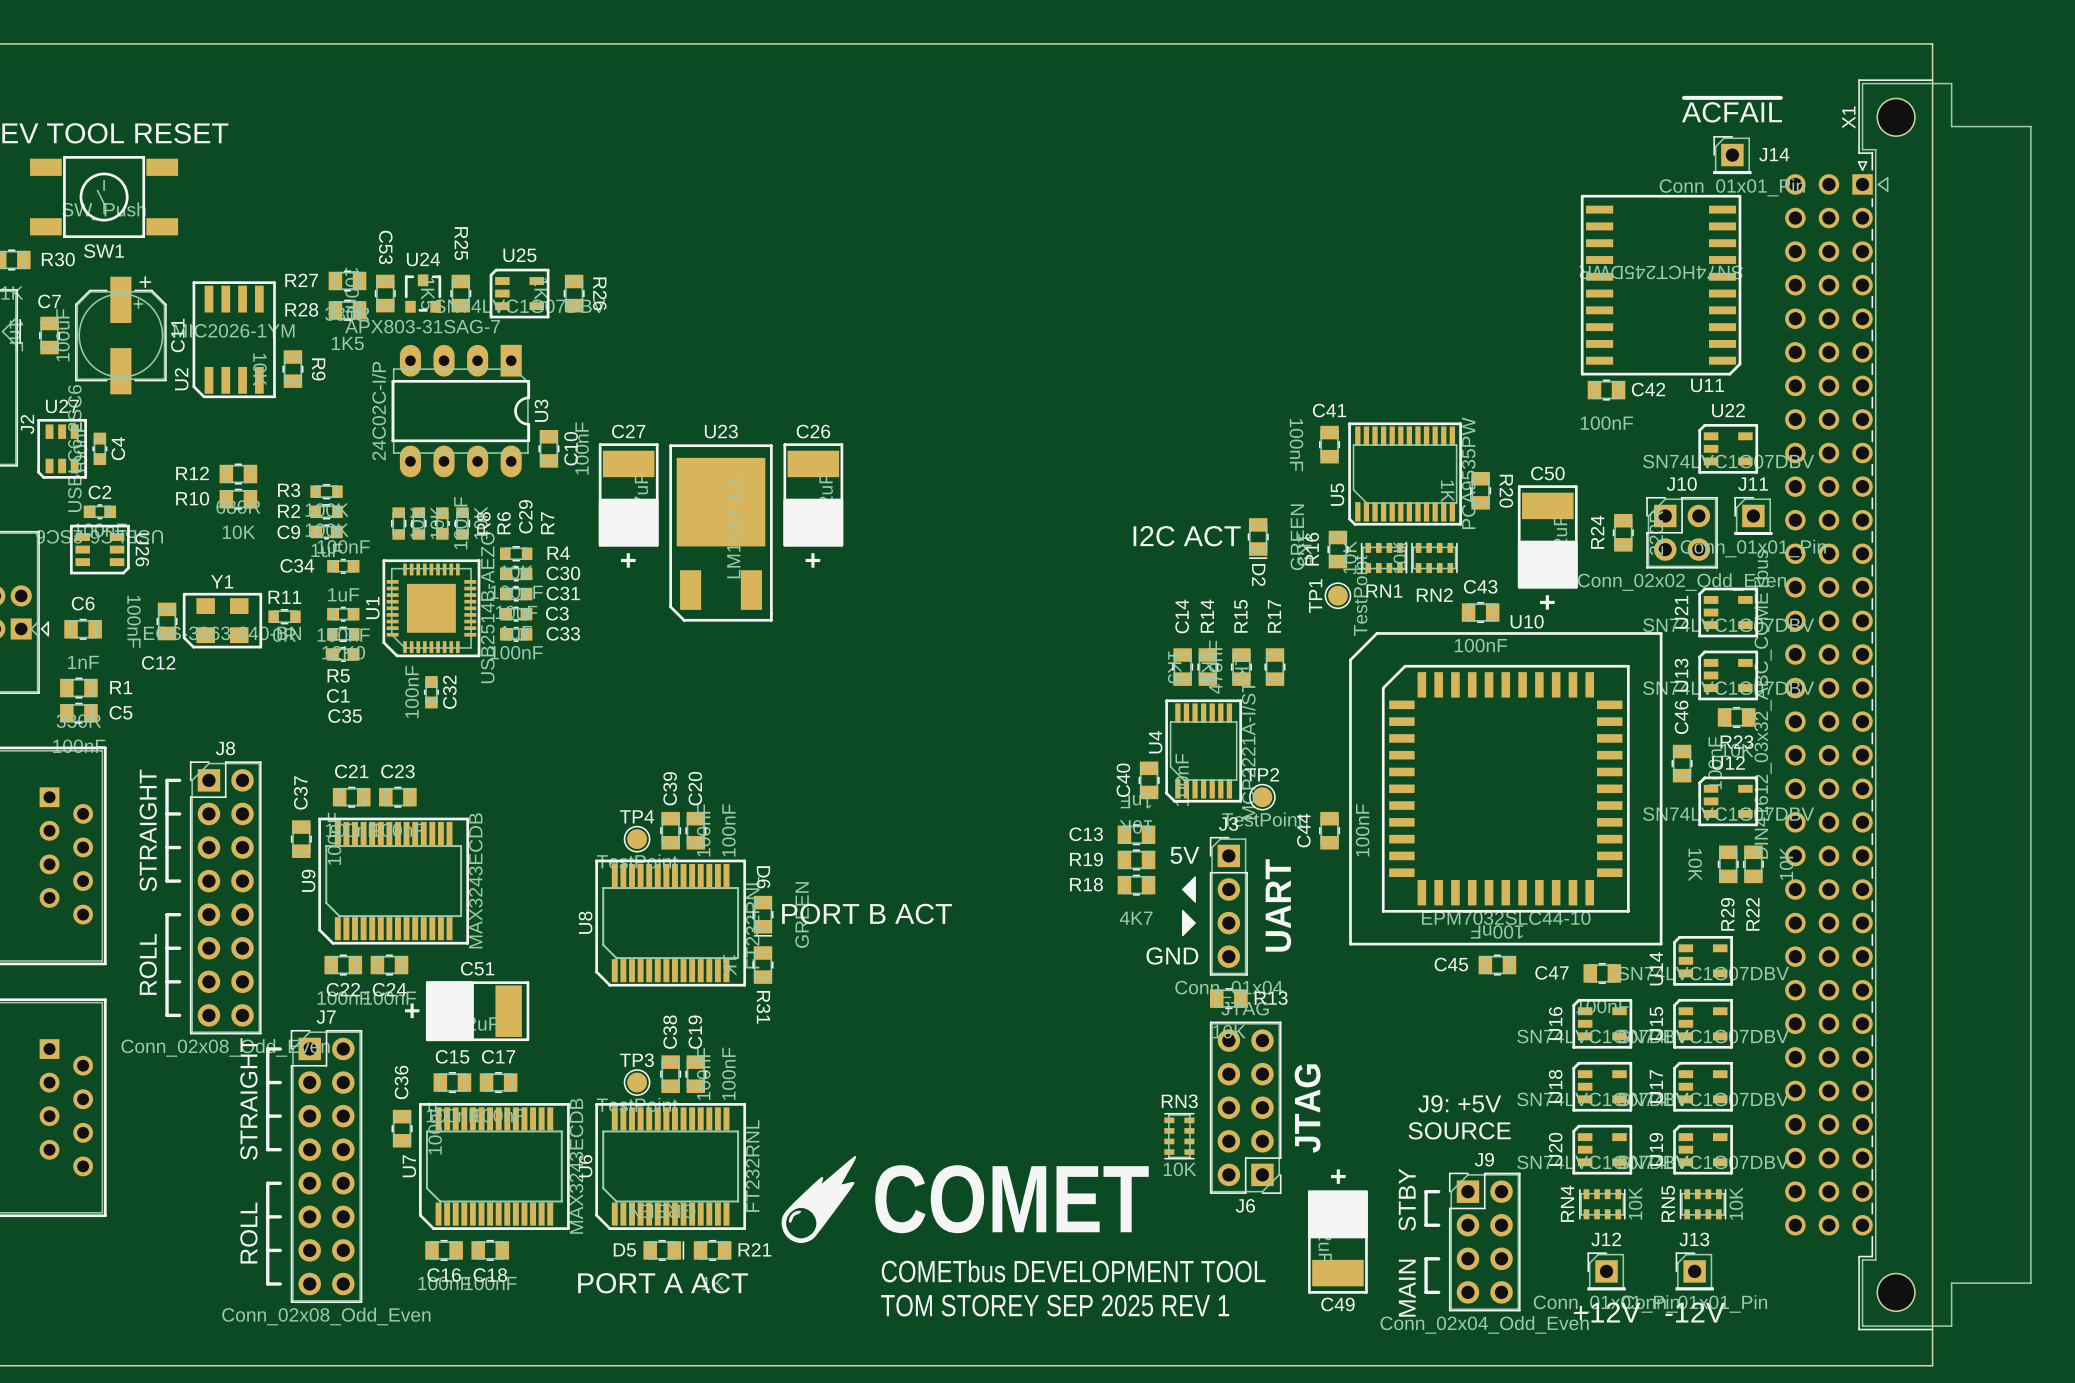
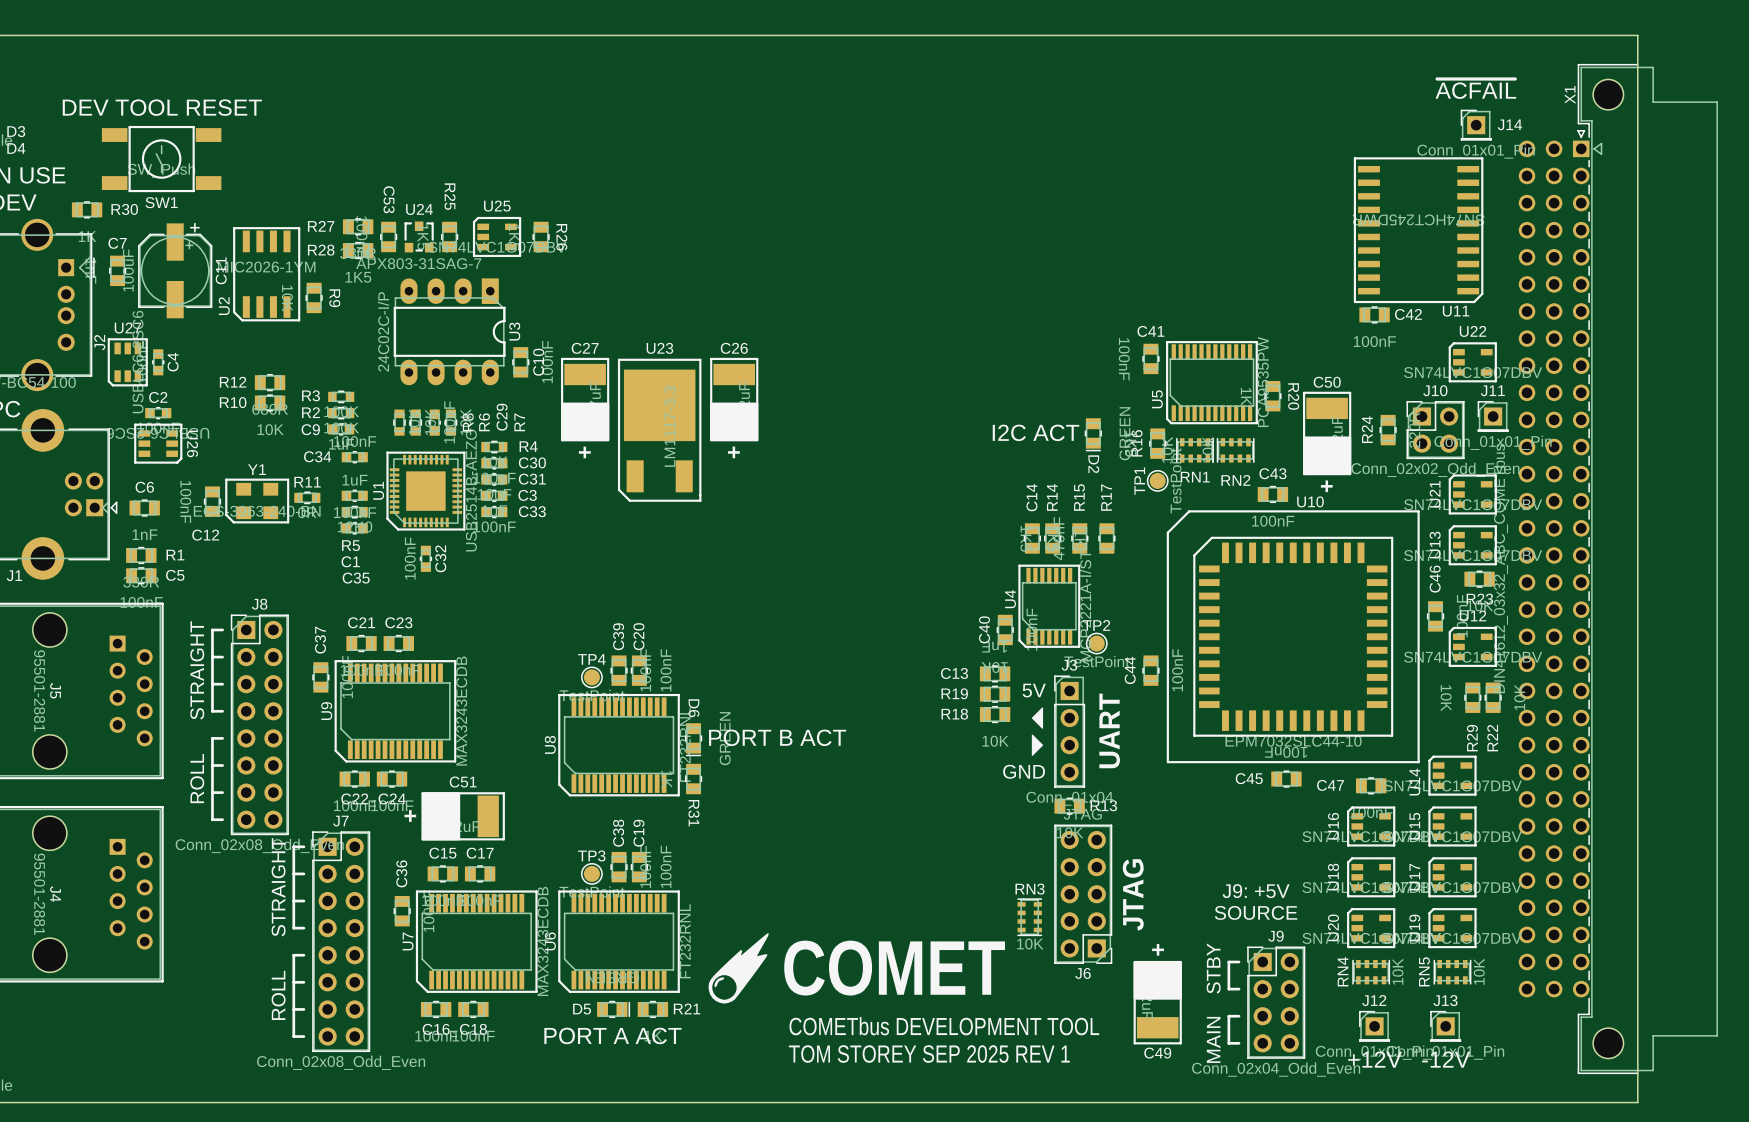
R18 value: 4K7 (1136, 918) -> 10K (995, 741)

